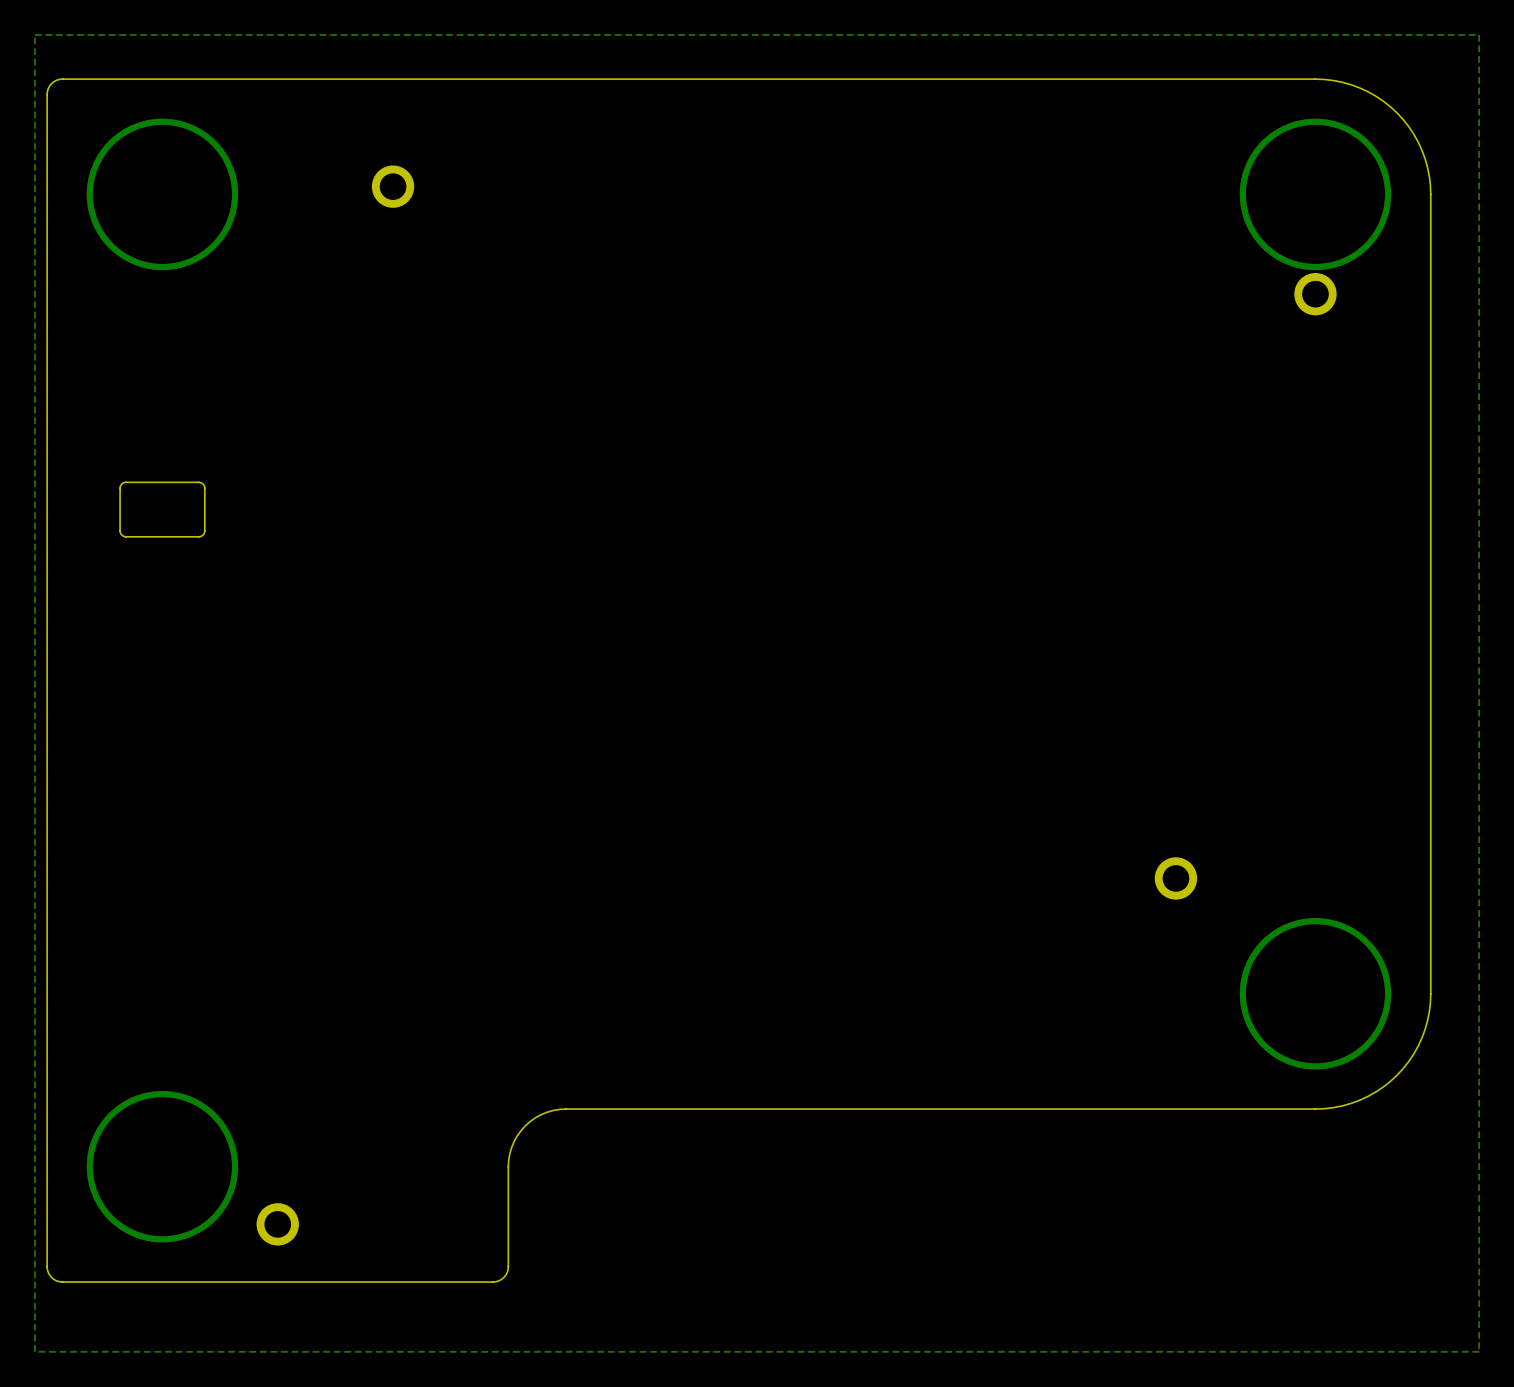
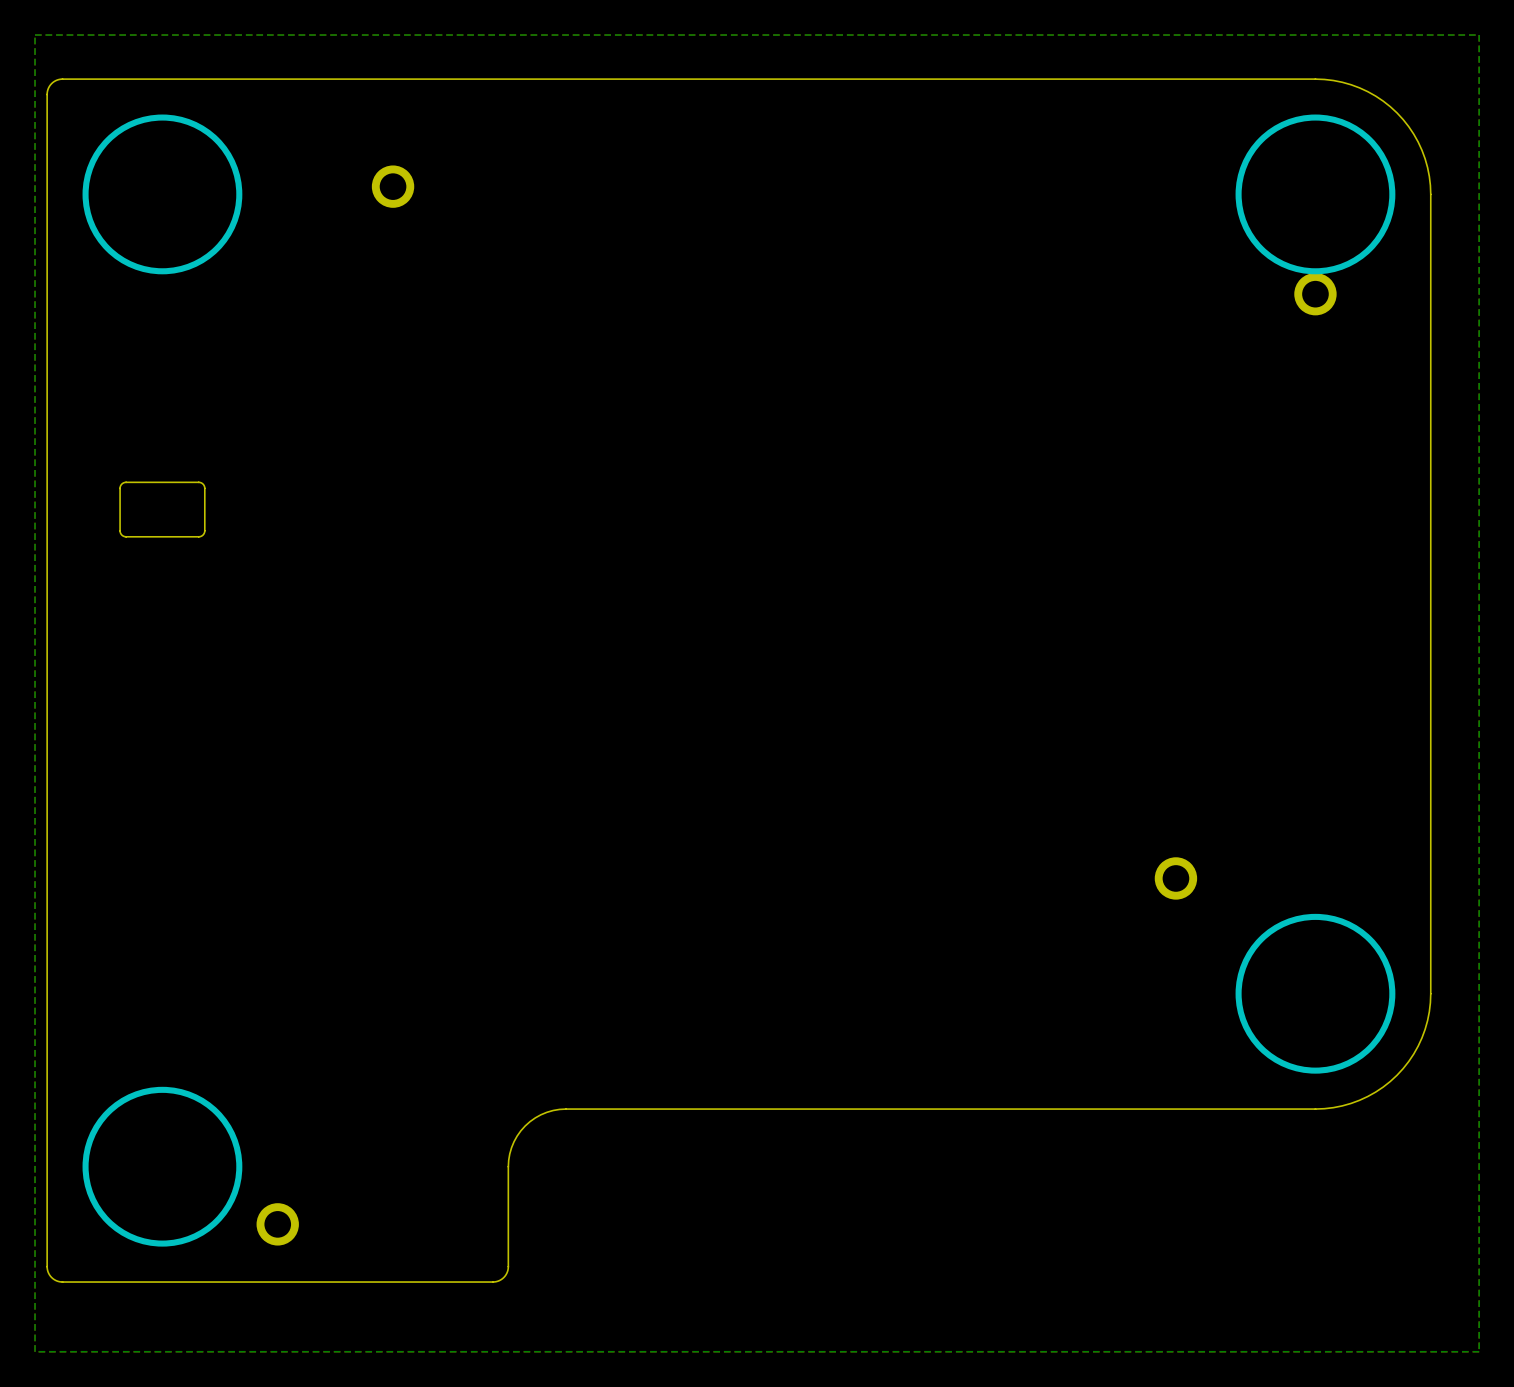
drawing: none -> [82, 114, 243, 275]
drawing: none -> [1235, 114, 1396, 275]
drawing: [86, 118, 239, 271] -> none
drawing: [1239, 118, 1392, 271] -> none
drawing: none -> [1235, 913, 1396, 1074]
drawing: [1239, 918, 1392, 1070] -> none
drawing: none -> [82, 1086, 243, 1247]
drawing: [86, 1091, 239, 1243] -> none

